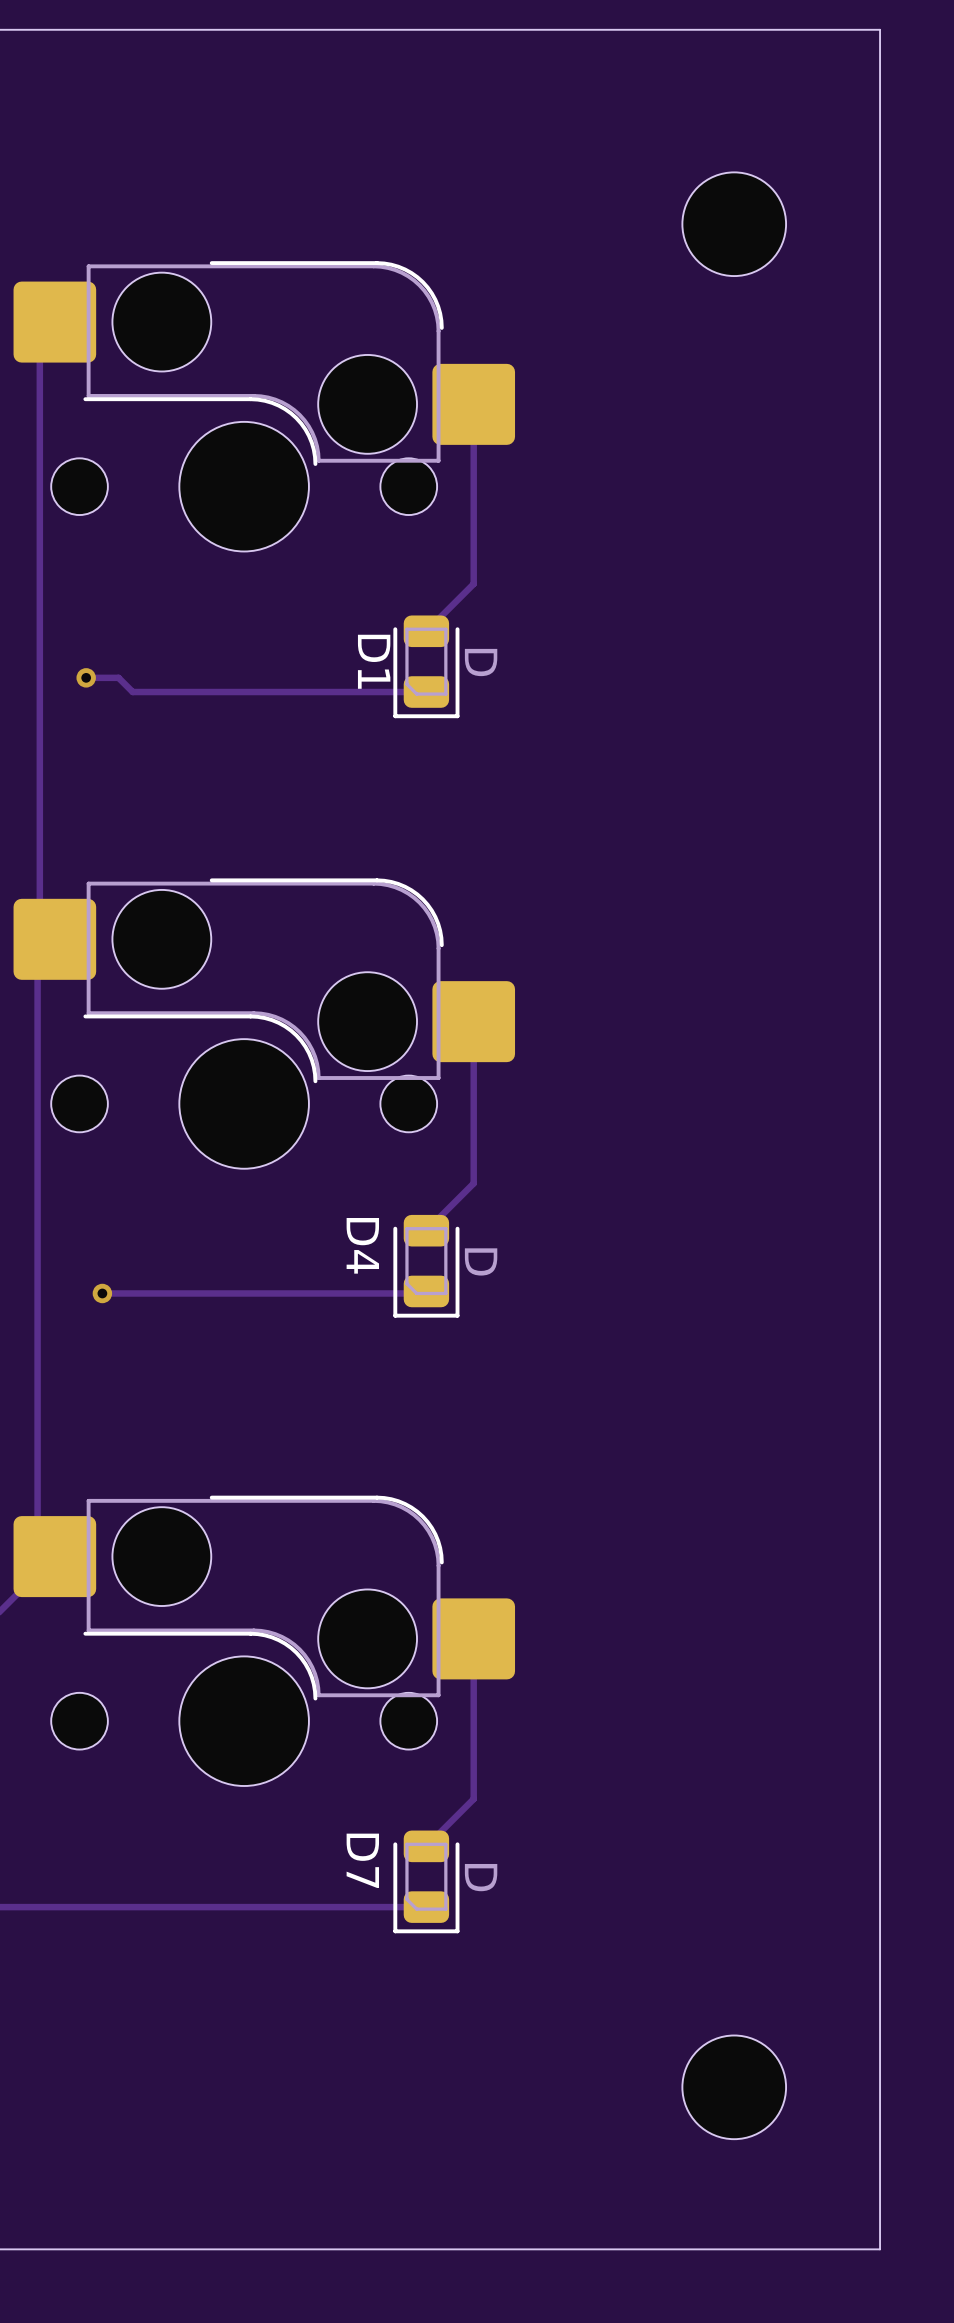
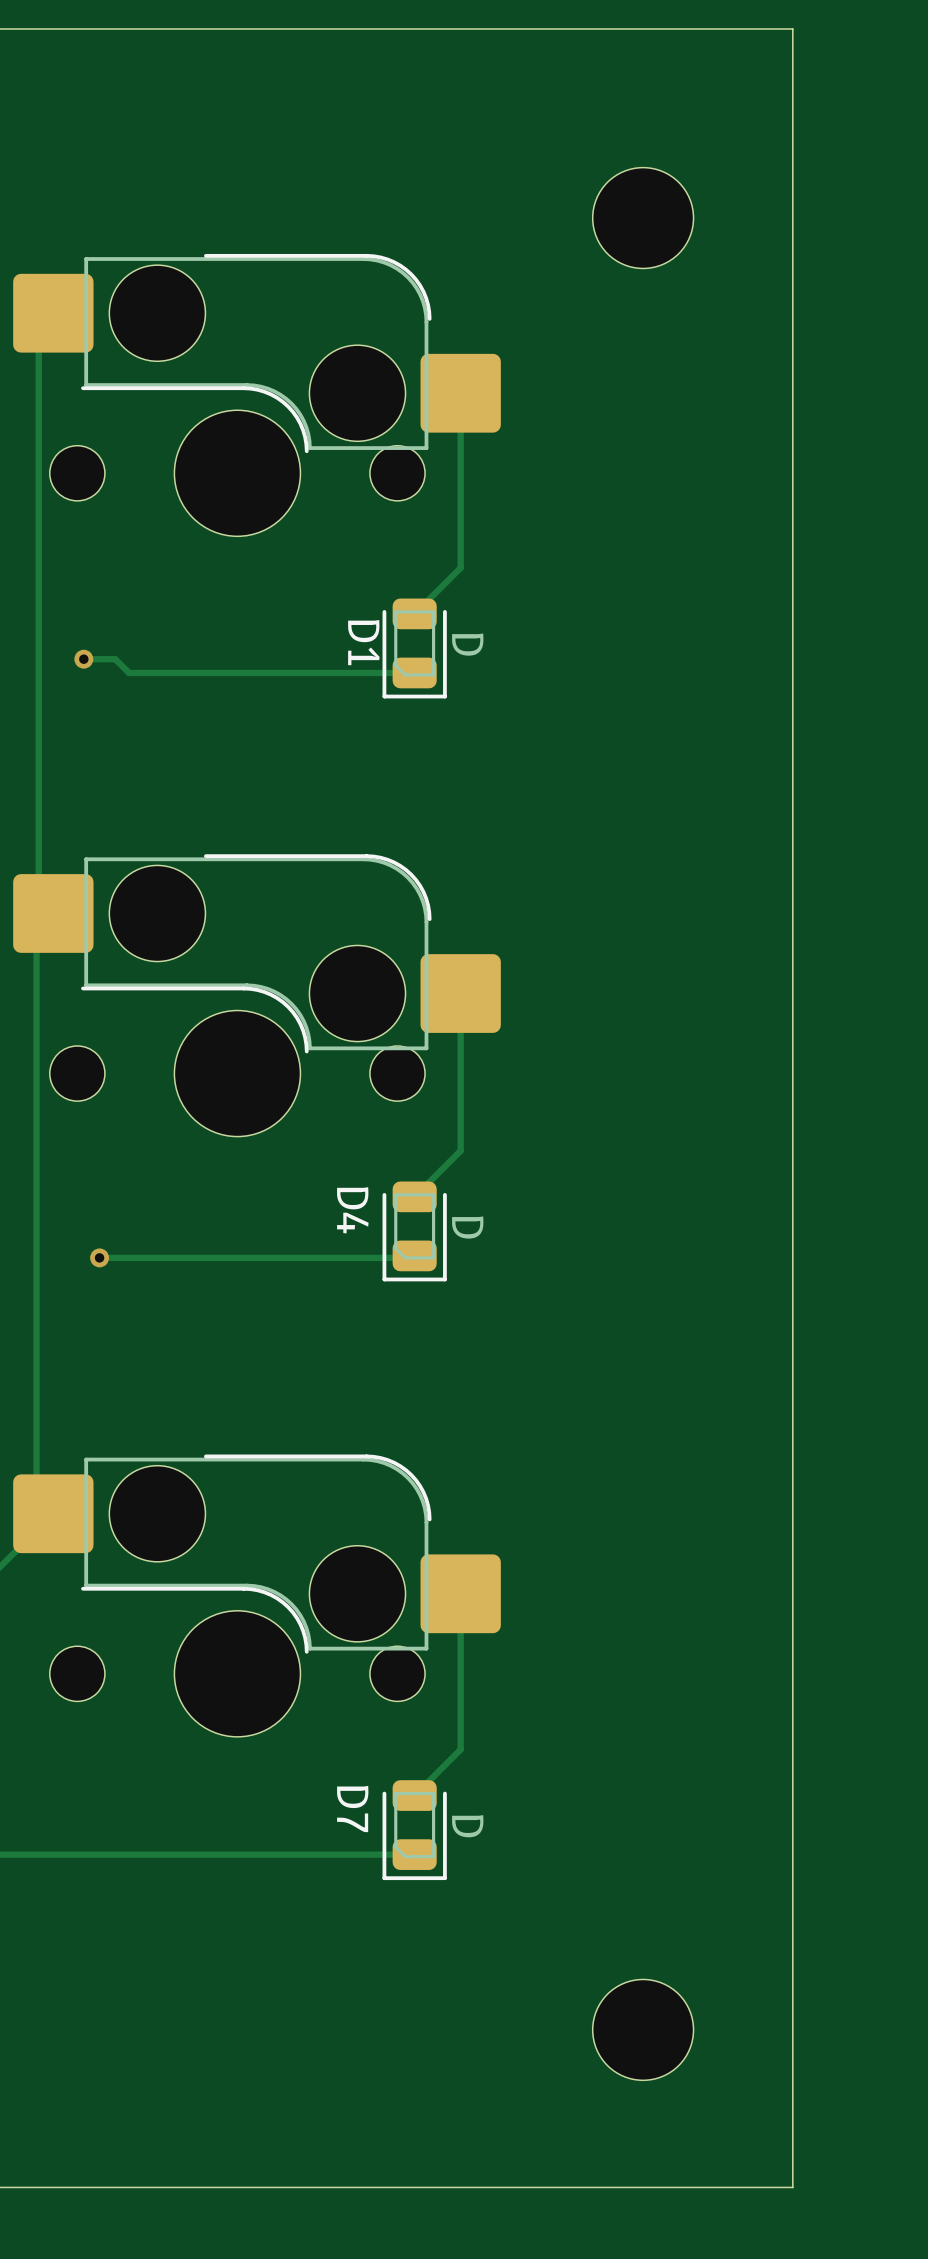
board edge: (815, 29) (880, 29) (880, 2249) (815, 2249) -> (792, 28) (792, 2187)
part position: (734, 224) -> (643, 218)
part position: (734, 2087) -> (643, 2029)

